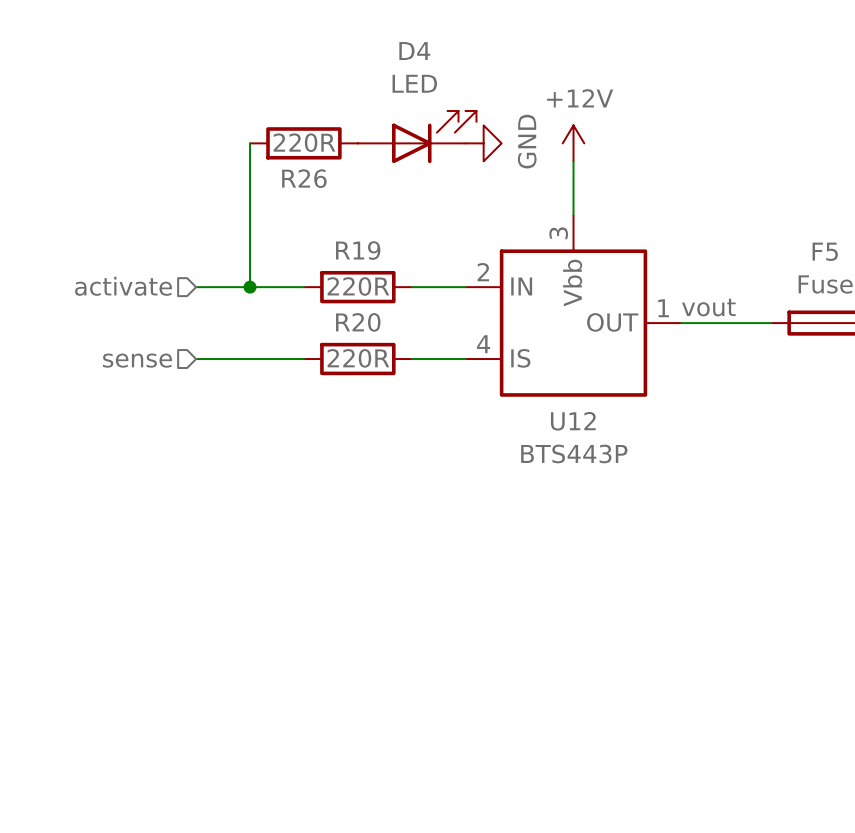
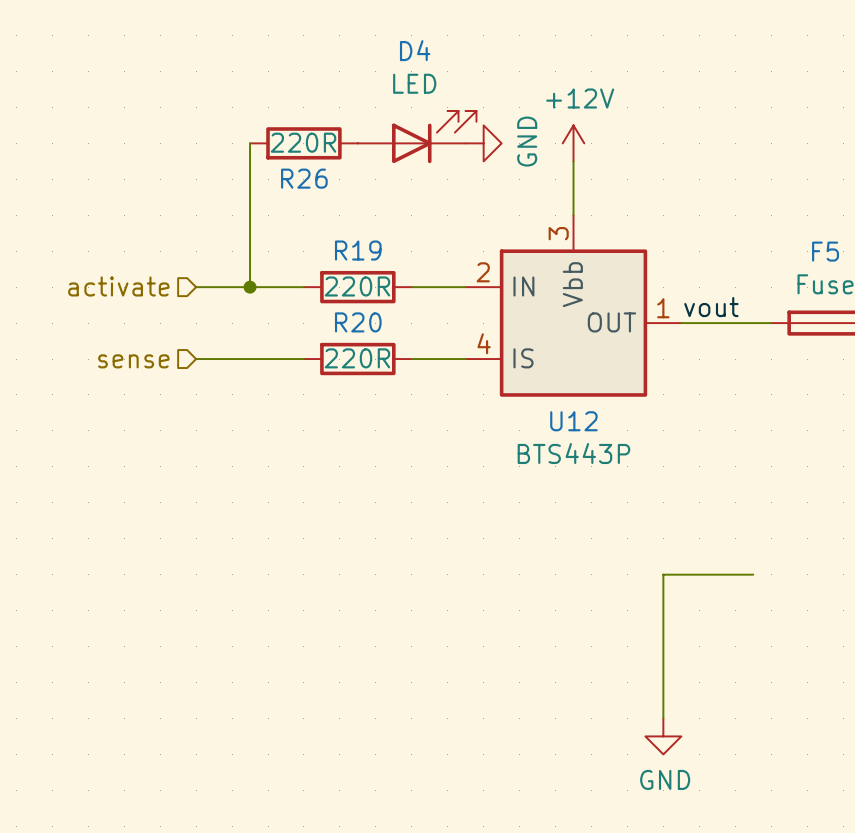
wire: none -> (753, 574) (663, 574) (663, 718)
power symbol: none -> GND (663, 736)

